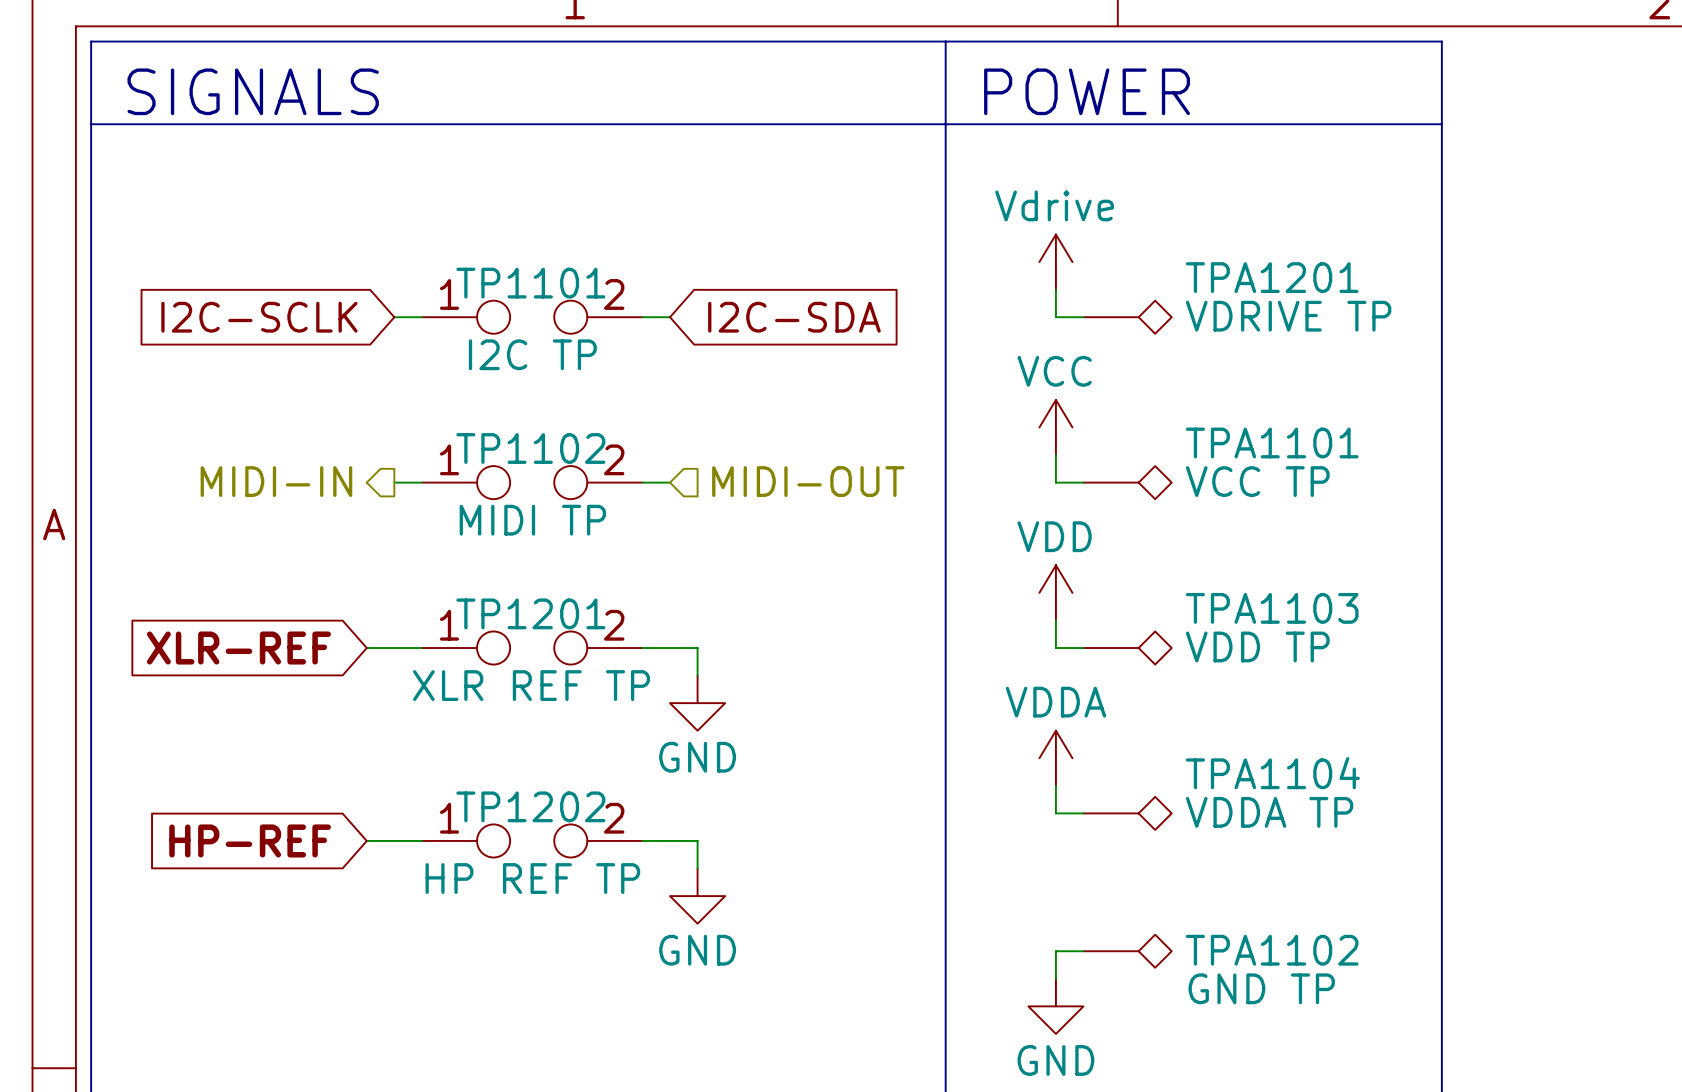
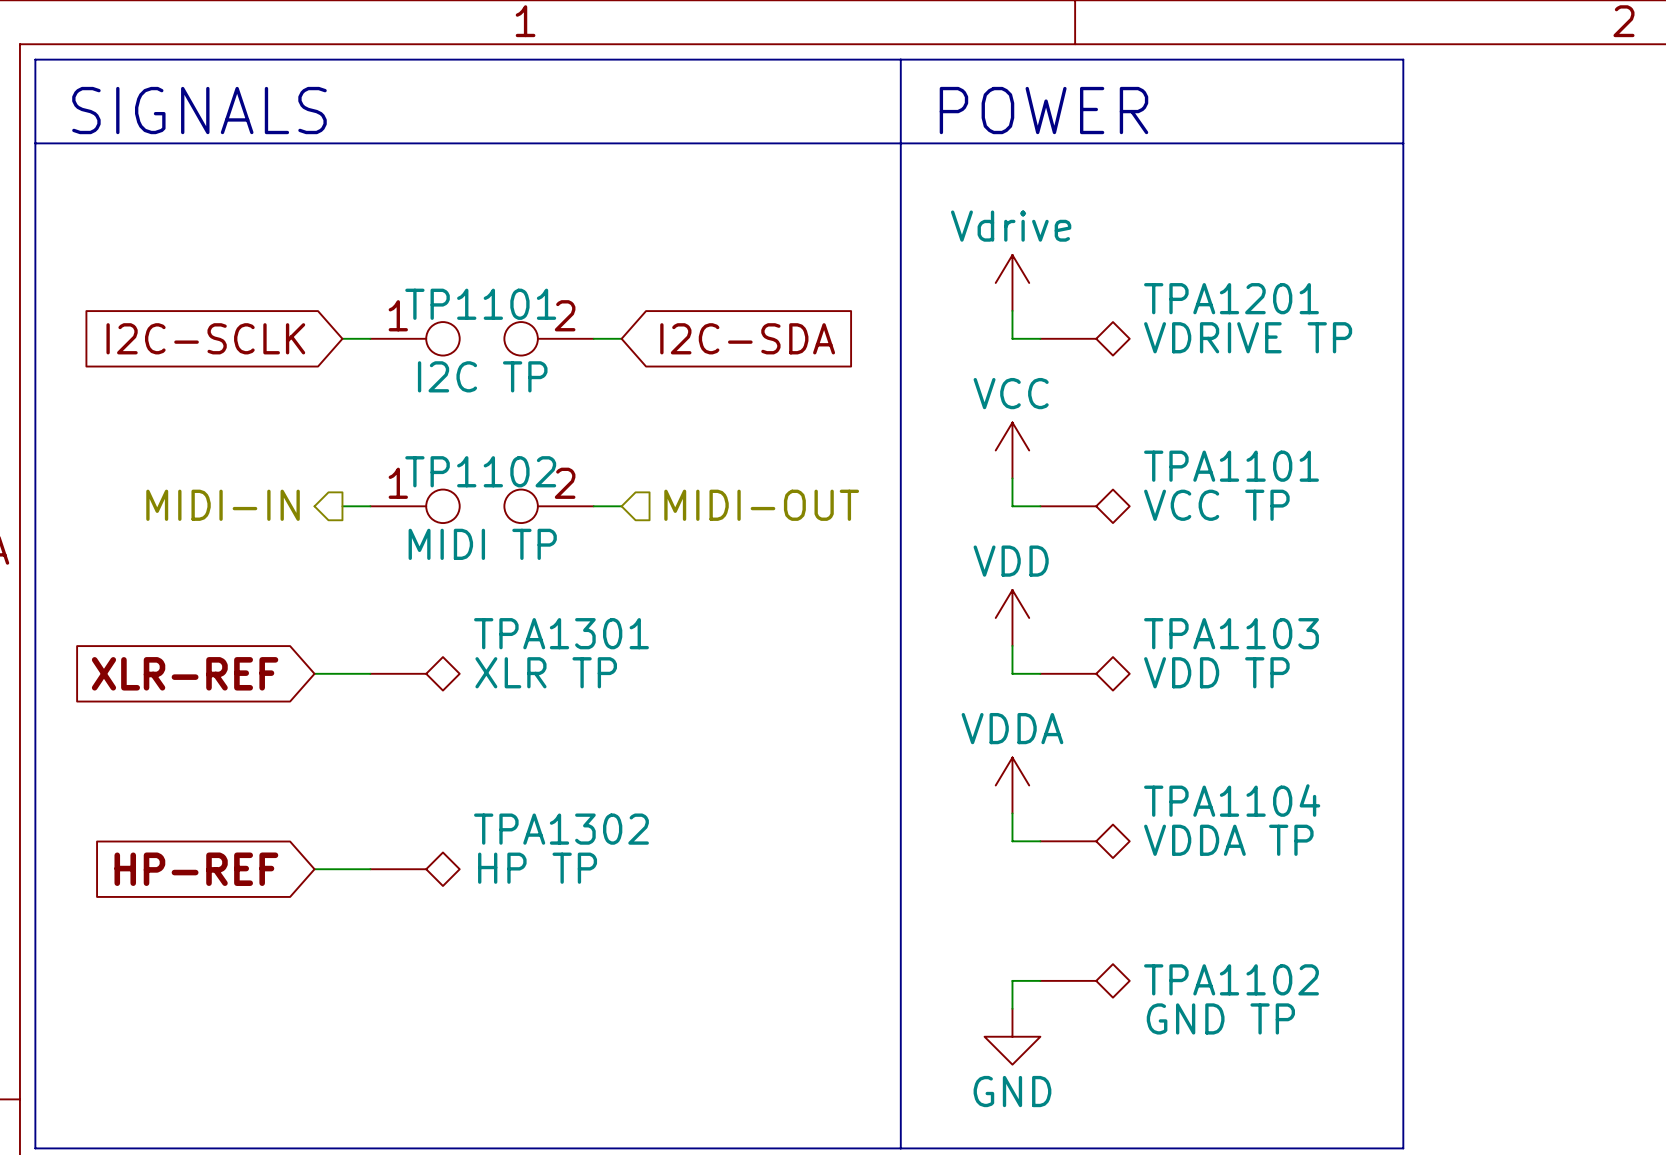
TPA1301: none -> XLR TP (415, 673)
TP1201: XLR REF TP (532, 648) -> none
wire: (642, 648) (697, 648) (697, 675) -> none
power symbol: GND (697, 703) -> none
TPA1302: none -> HP TP (415, 869)
TP1202: HP REF TP (532, 840) -> none
wire: (642, 840) (697, 840) (697, 868) -> none
power symbol: GND (697, 896) -> none

